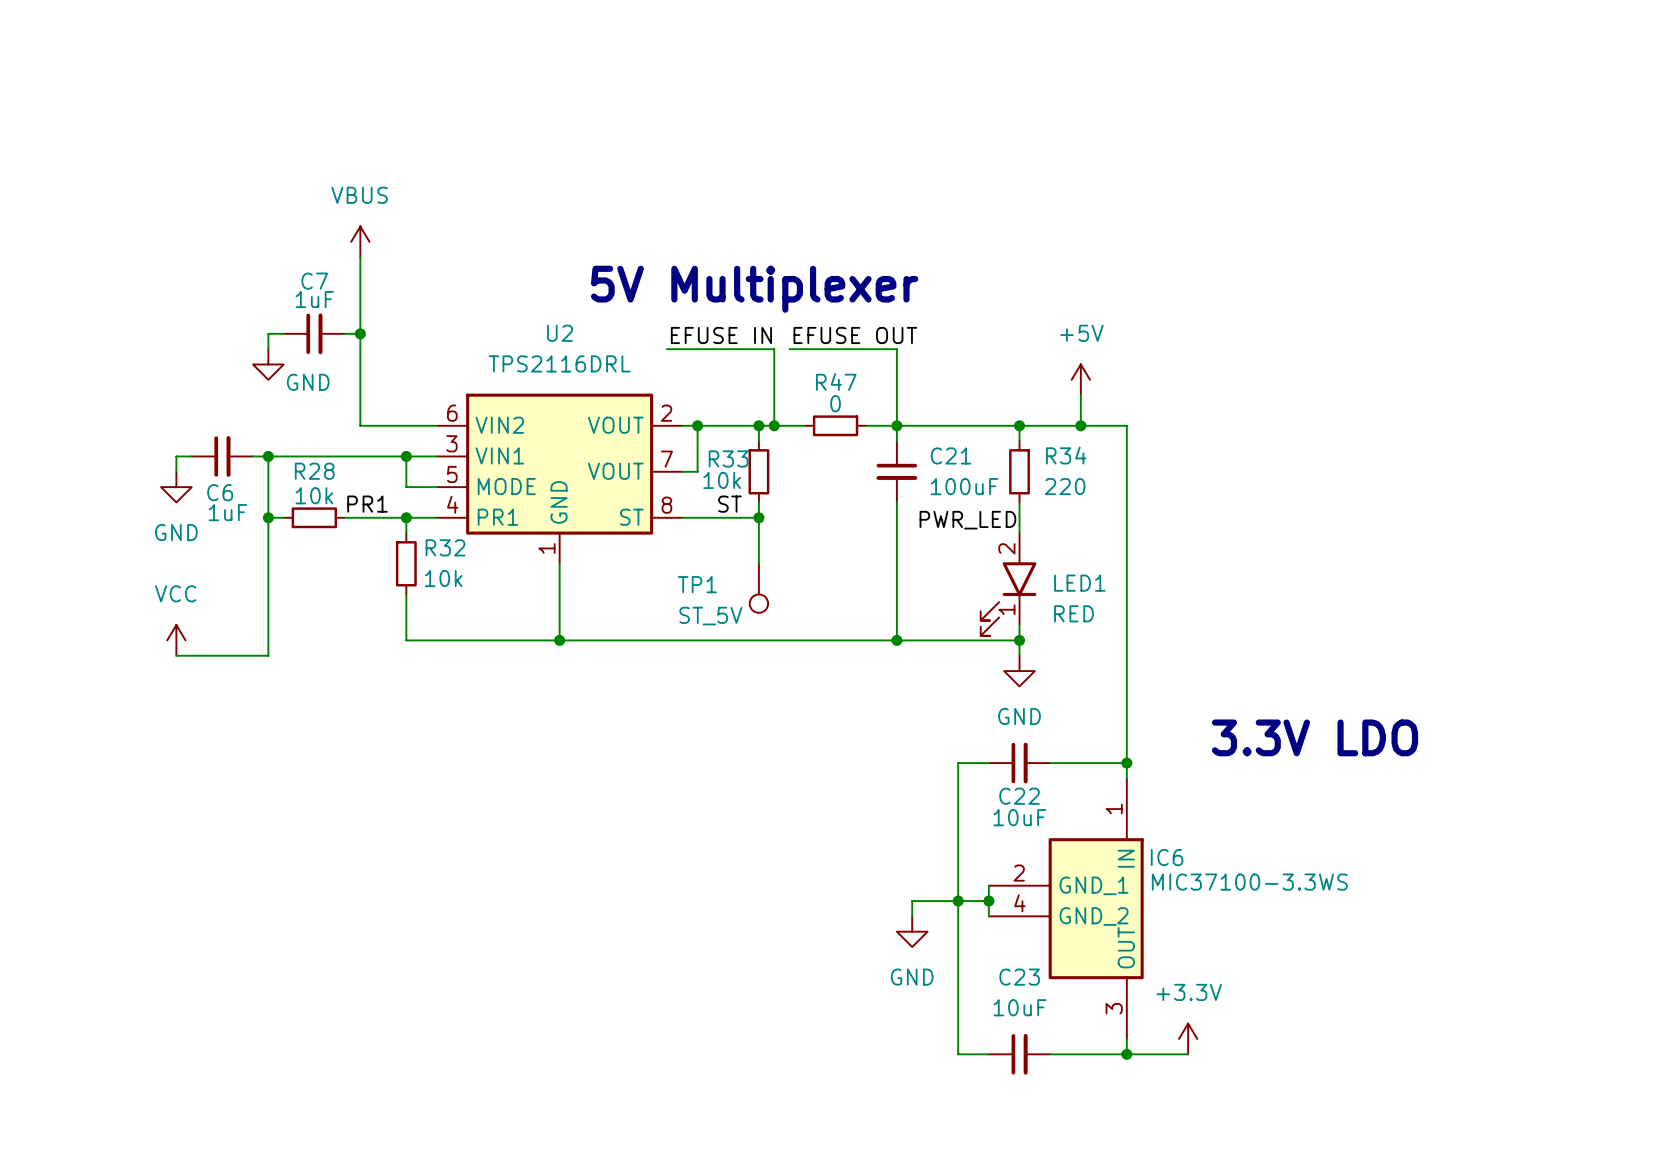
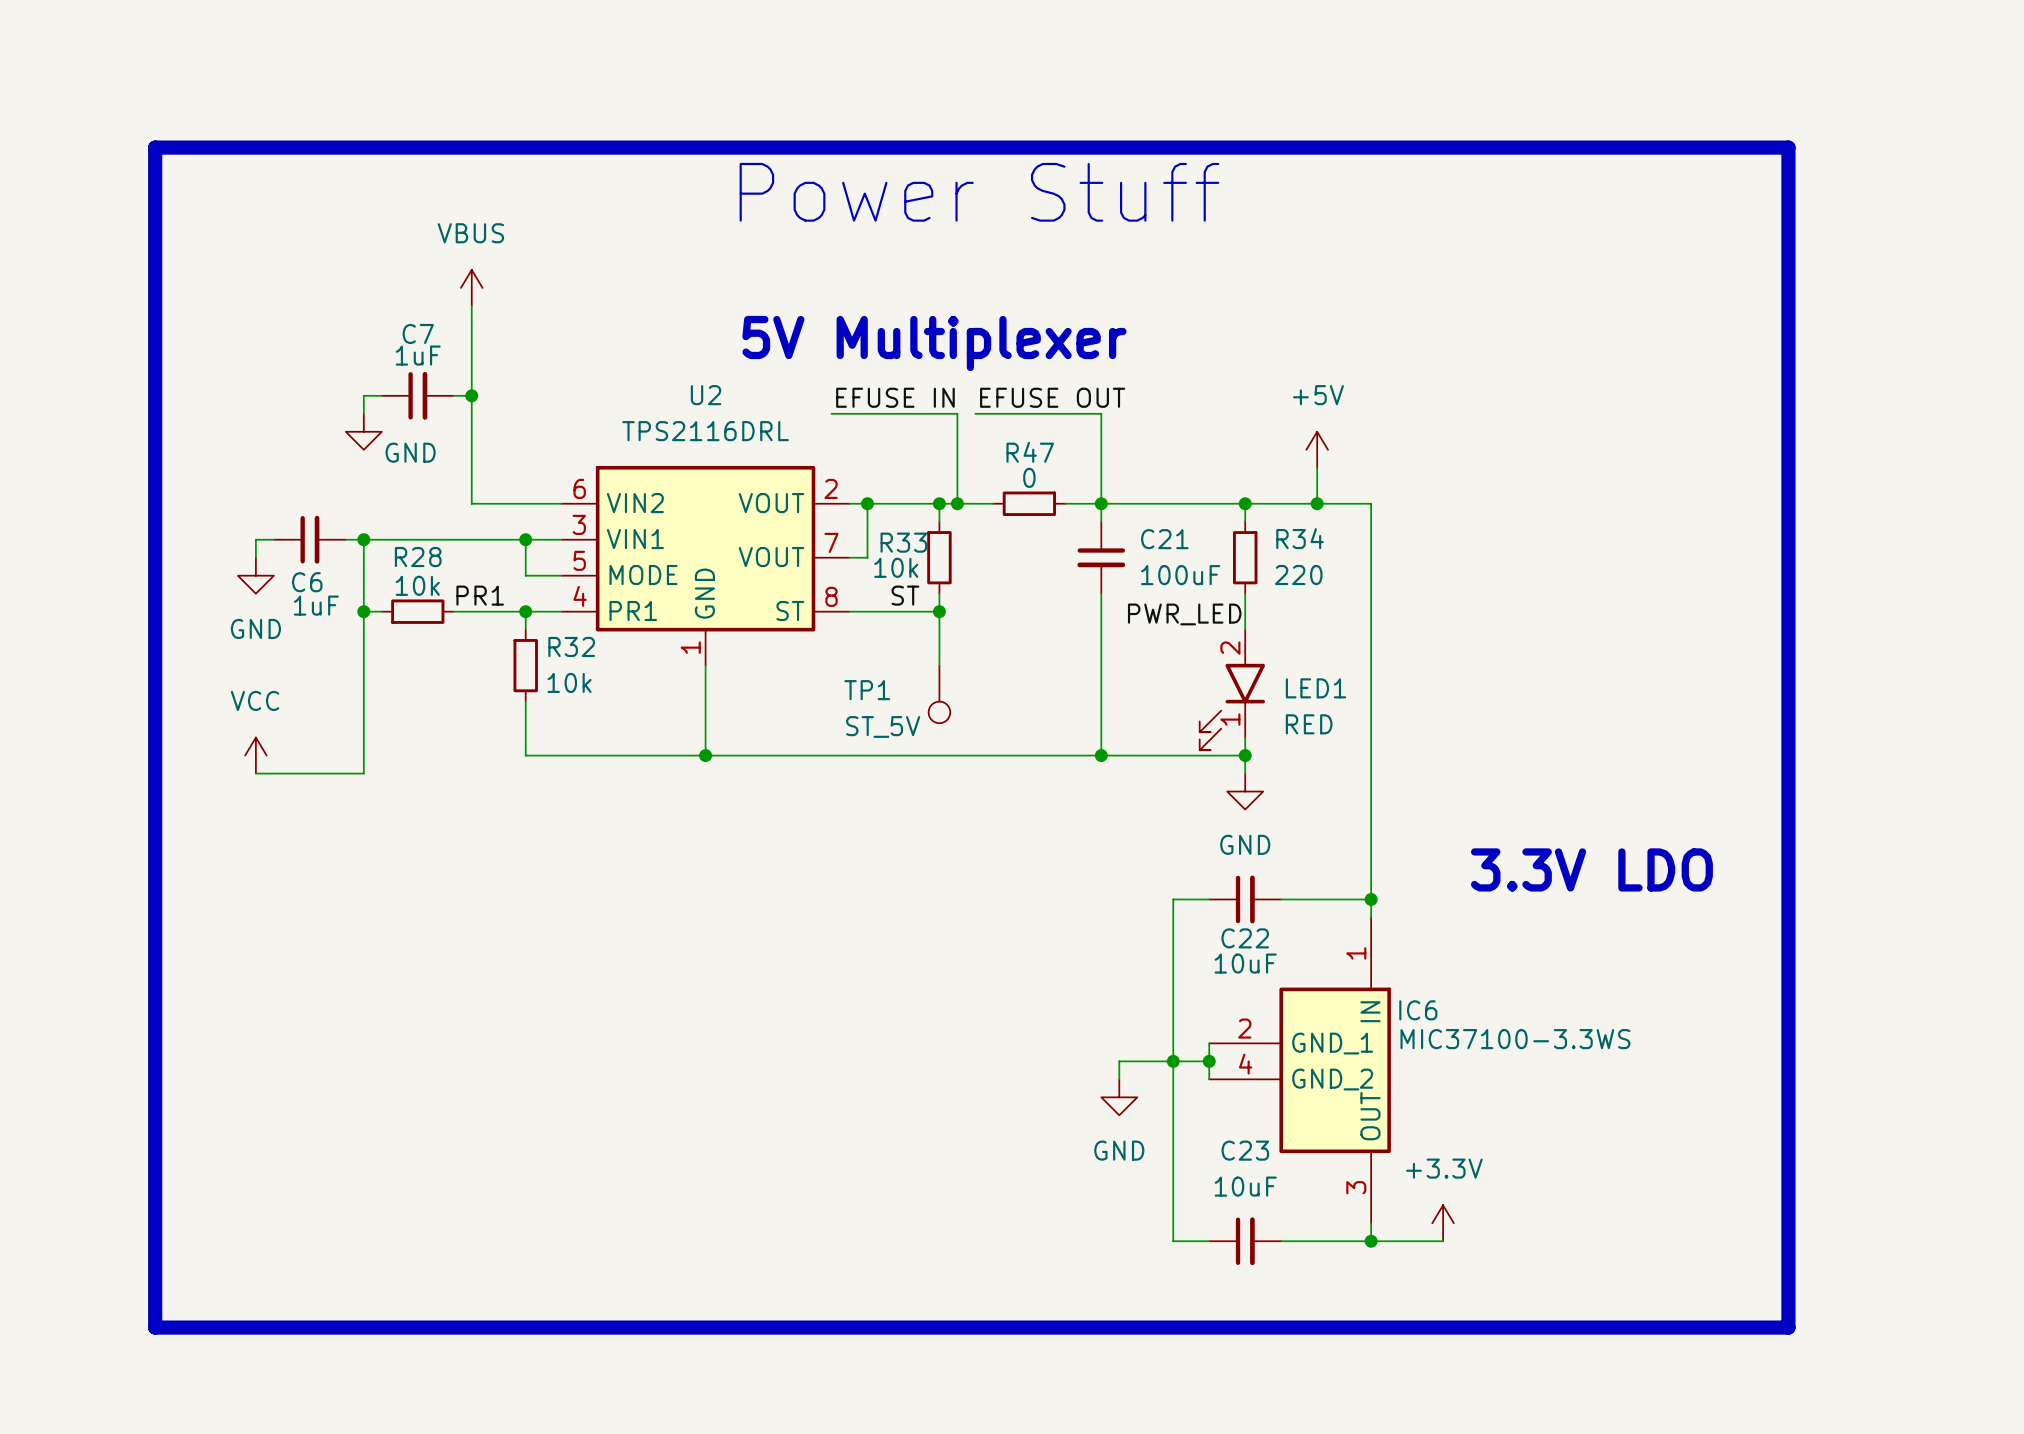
line: none -> (155, 147) (1788, 147) (1788, 1327) (155, 1327) (155, 147)
text: none -> Power Stuff (979, 192)

